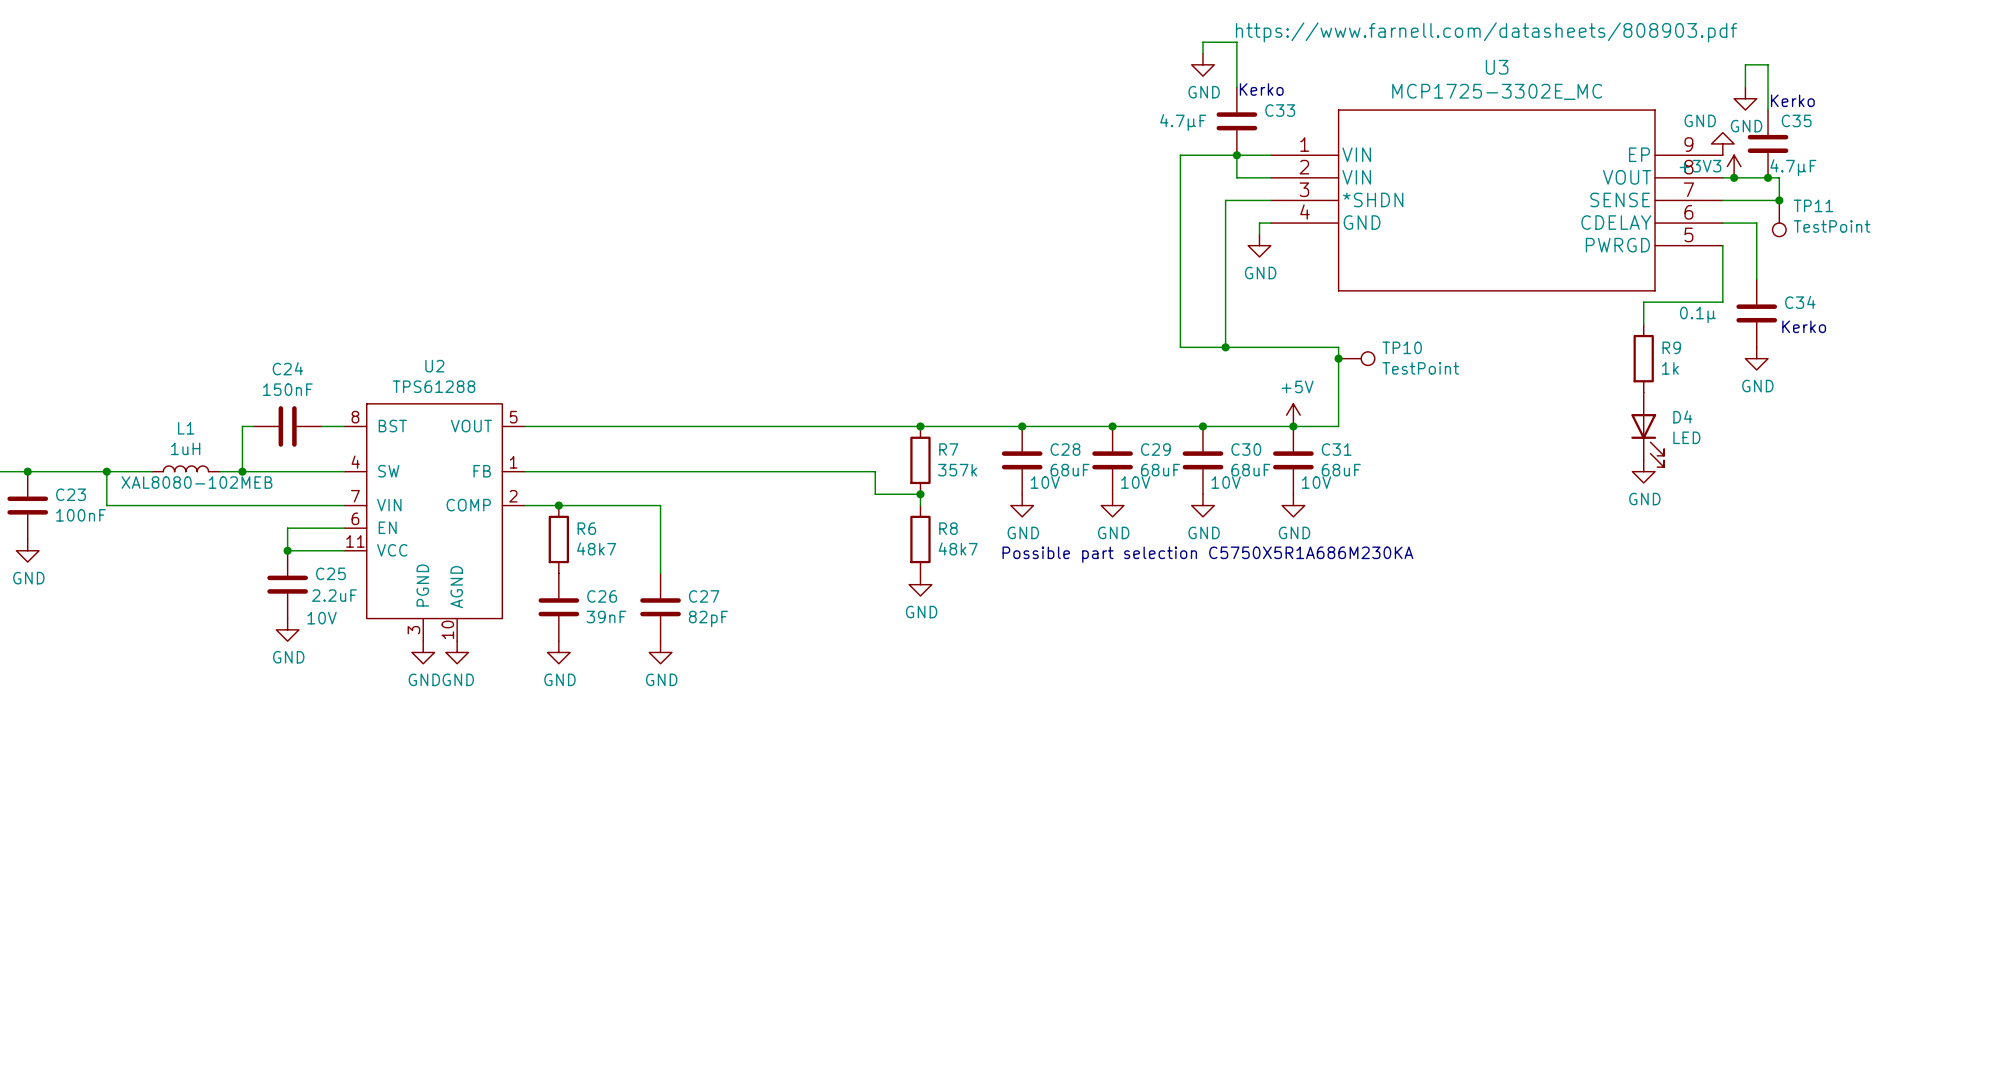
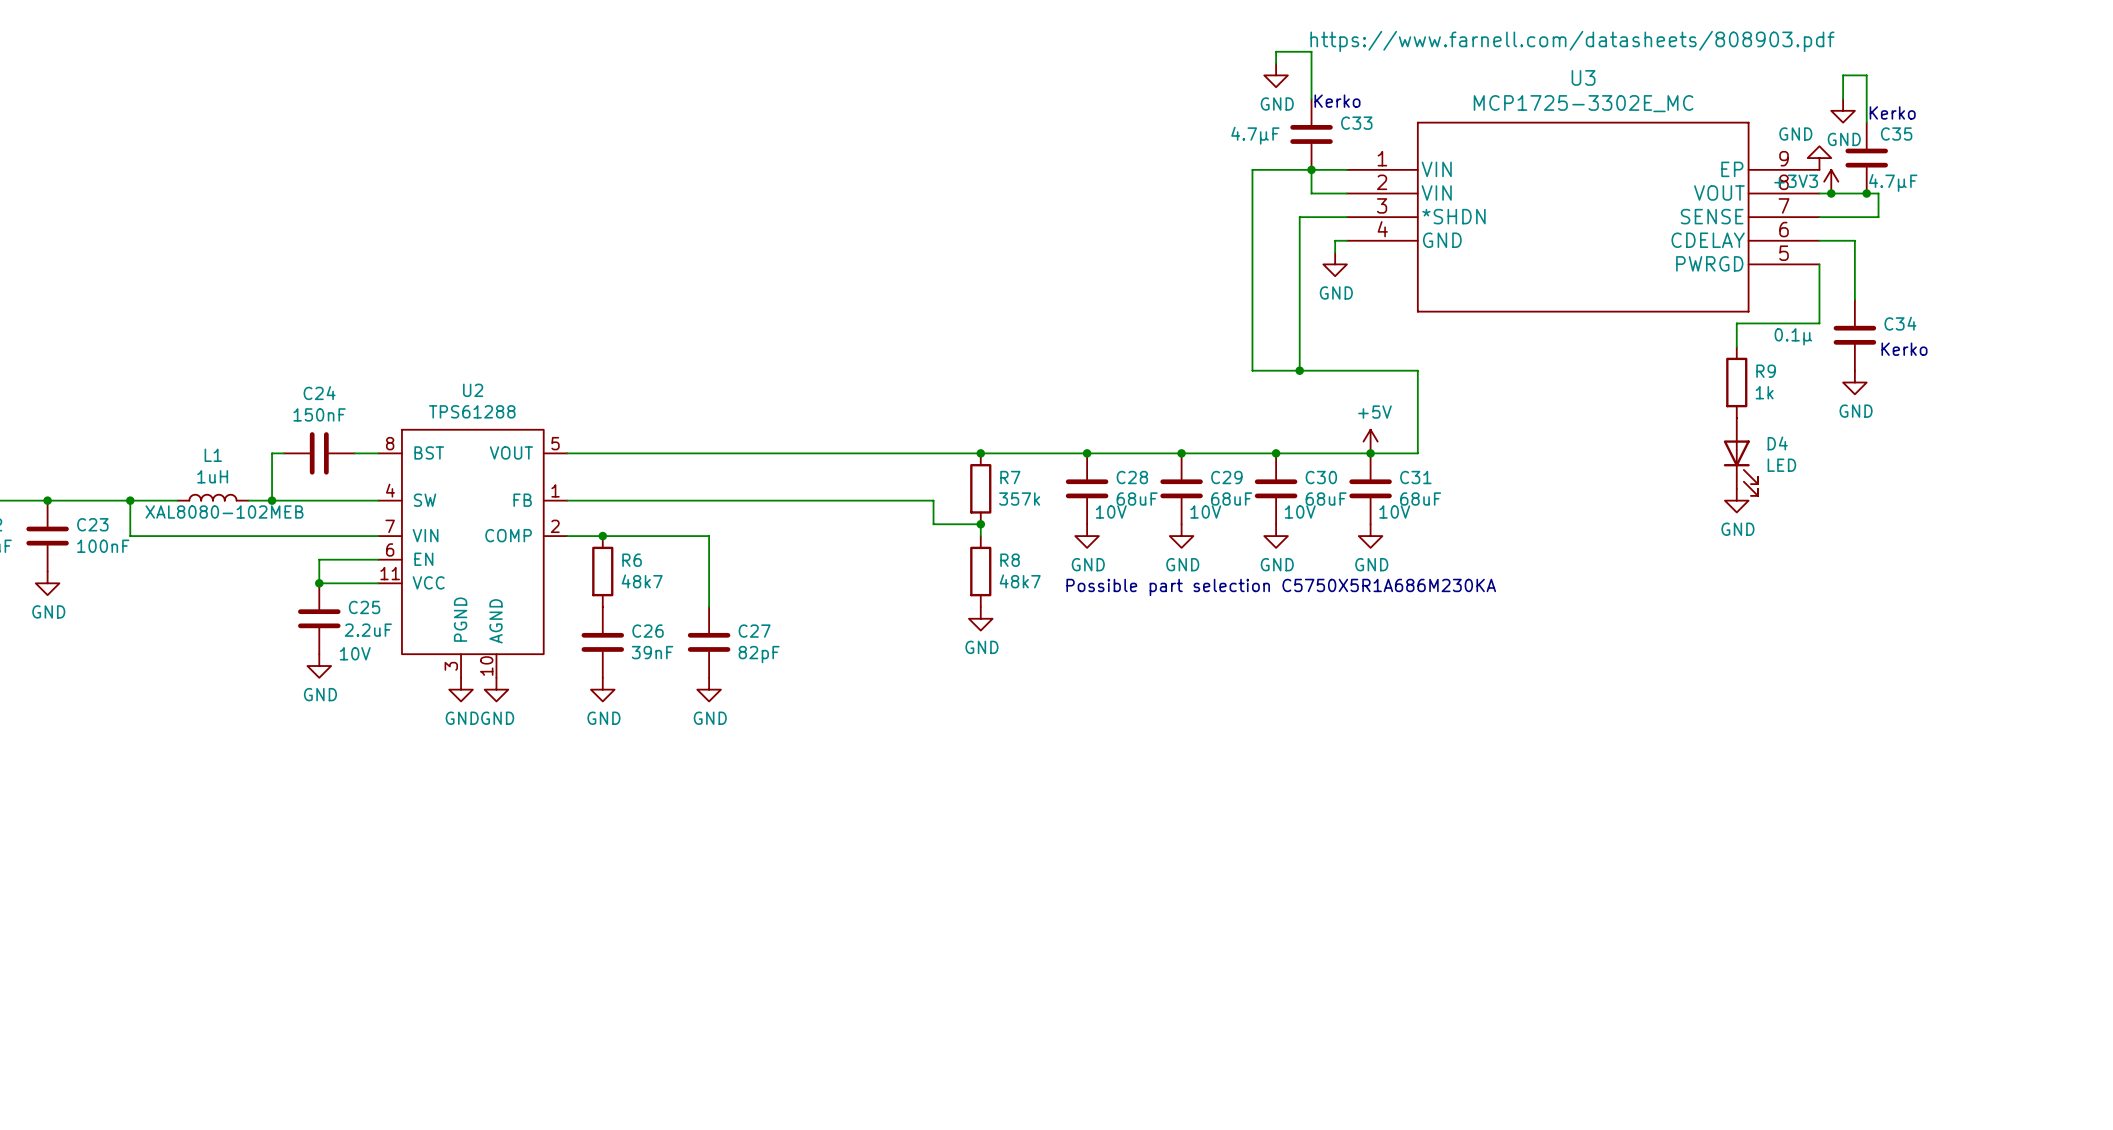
junction: (1779, 200) -> none
TP11: TestPoint (1779, 218) -> none
junction: (1338, 358) -> none
TP10: TestPoint (1356, 358) -> none

